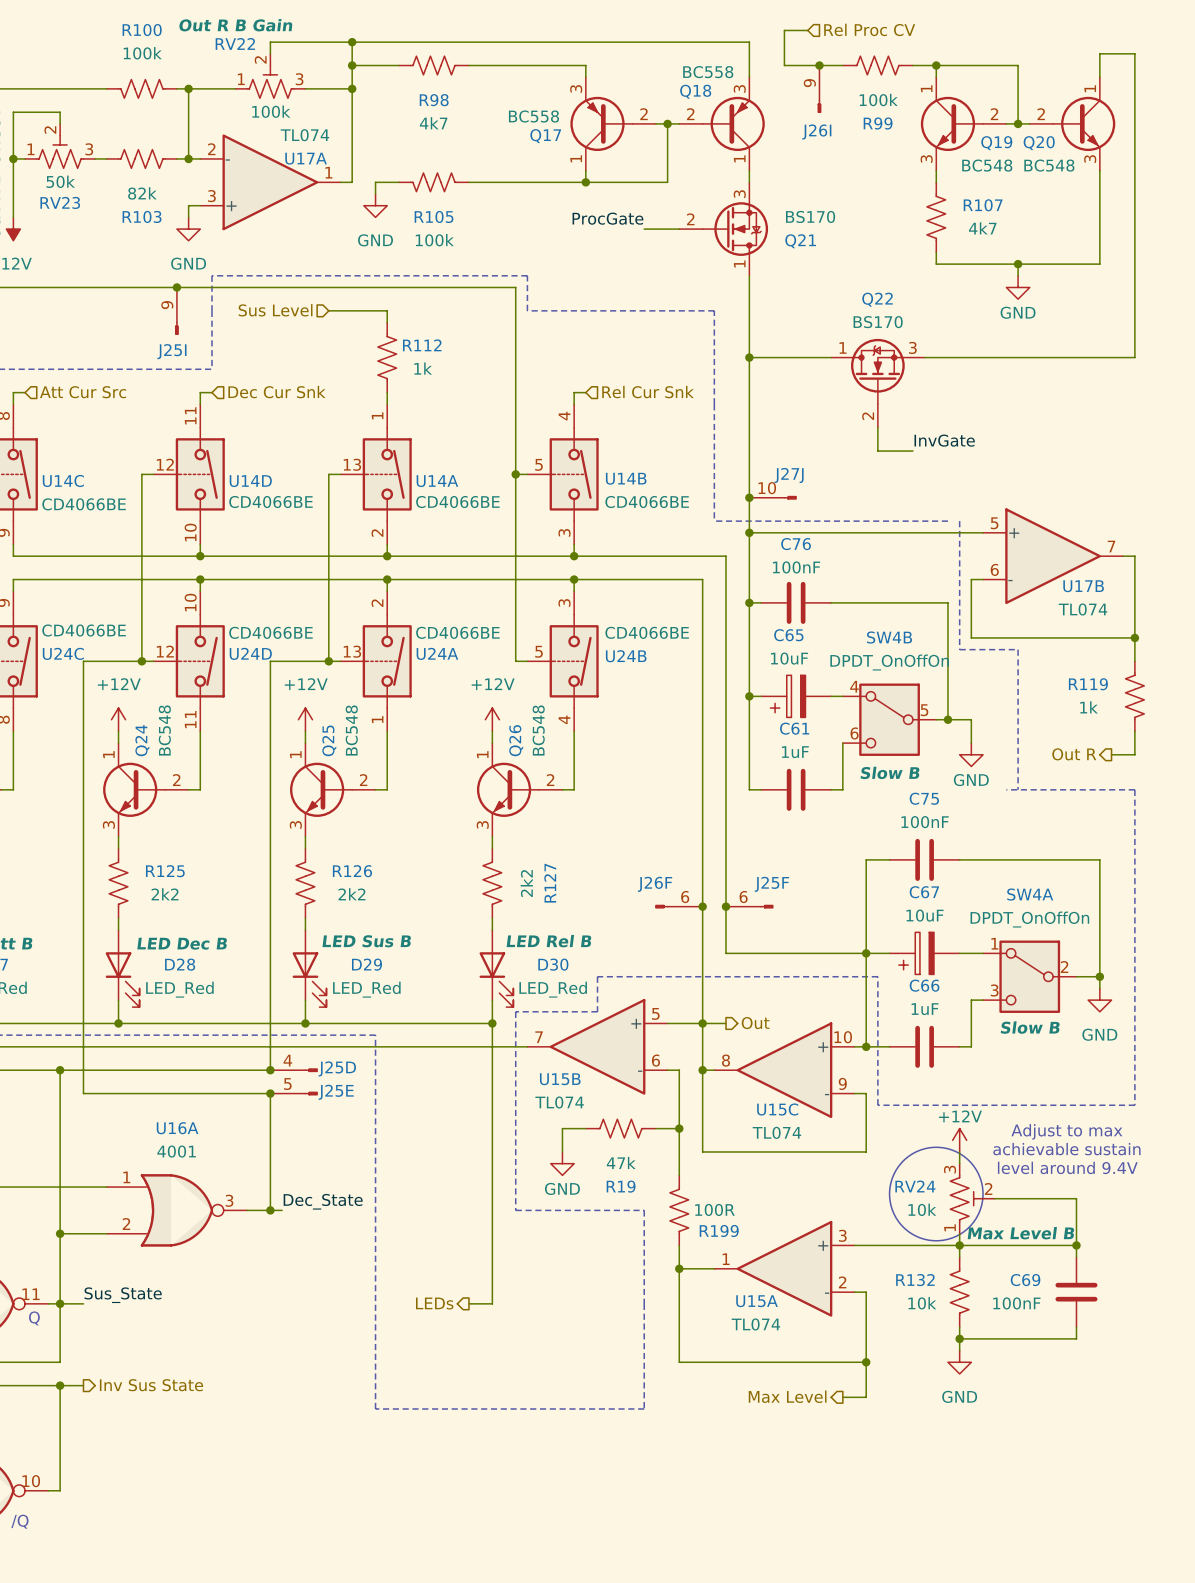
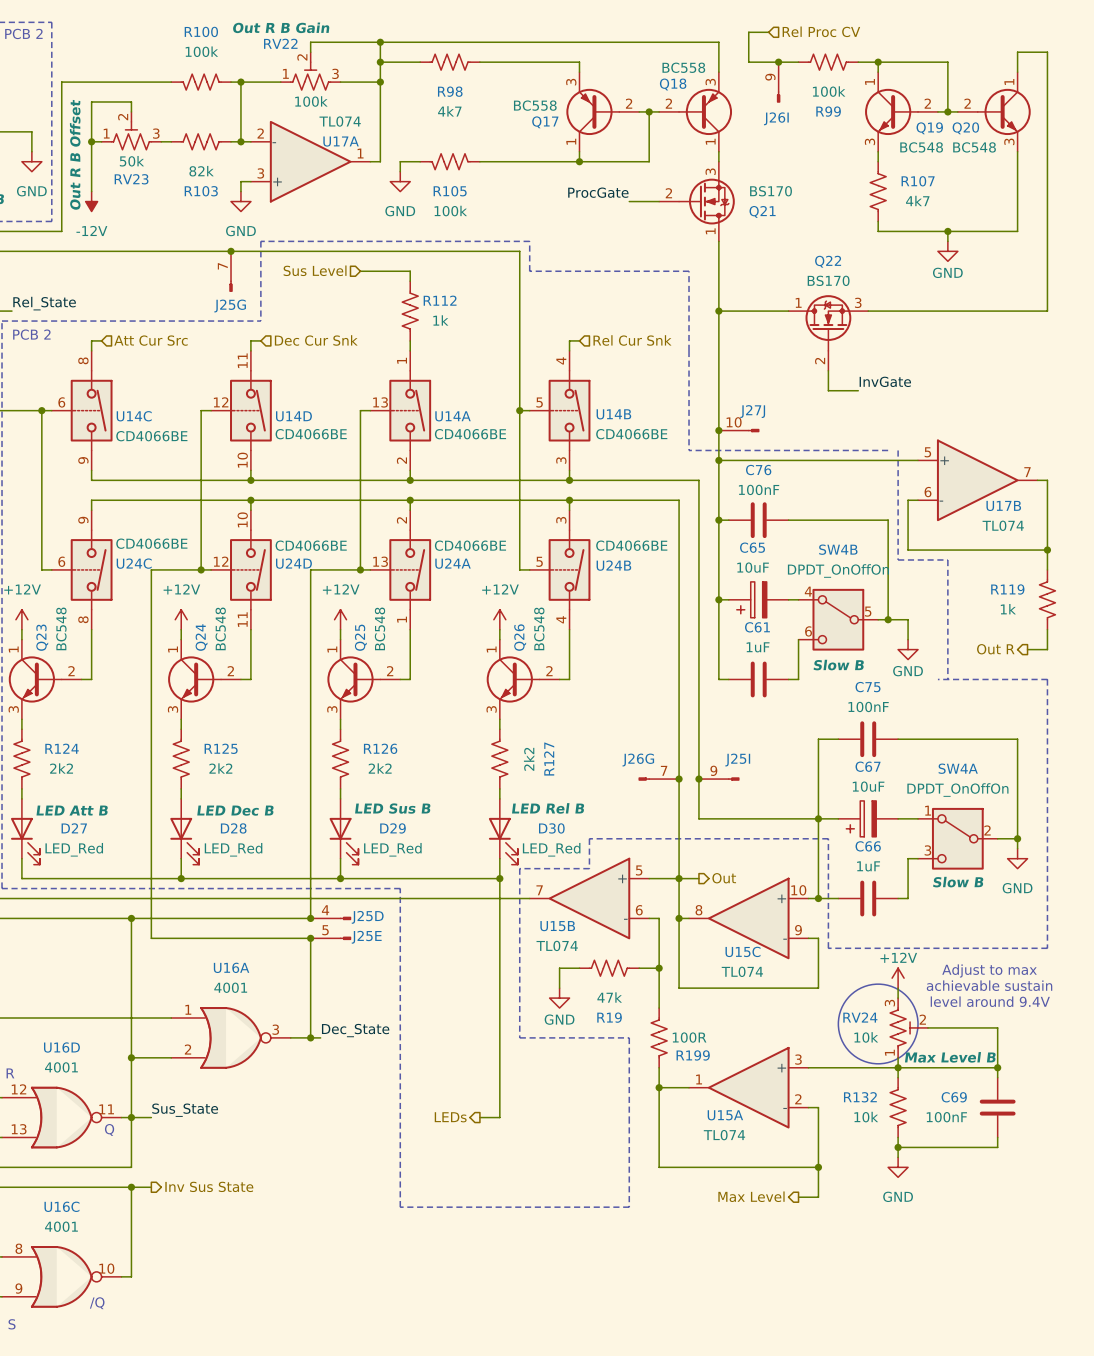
J25I position: (176, 311) -> (719, 779)
J25G: none -> (231, 271)
J25I rotation: 0° (176, 328) -> 90° counterclockwise (733, 779)
J25I name position: J25I (171, 351) -> J25I (737, 760)
J26F name: J26F (655, 884) -> J26G (638, 760)
J26F pin number: 6 (685, 897) -> 7 (664, 770)
J25F: (749, 906) -> none

